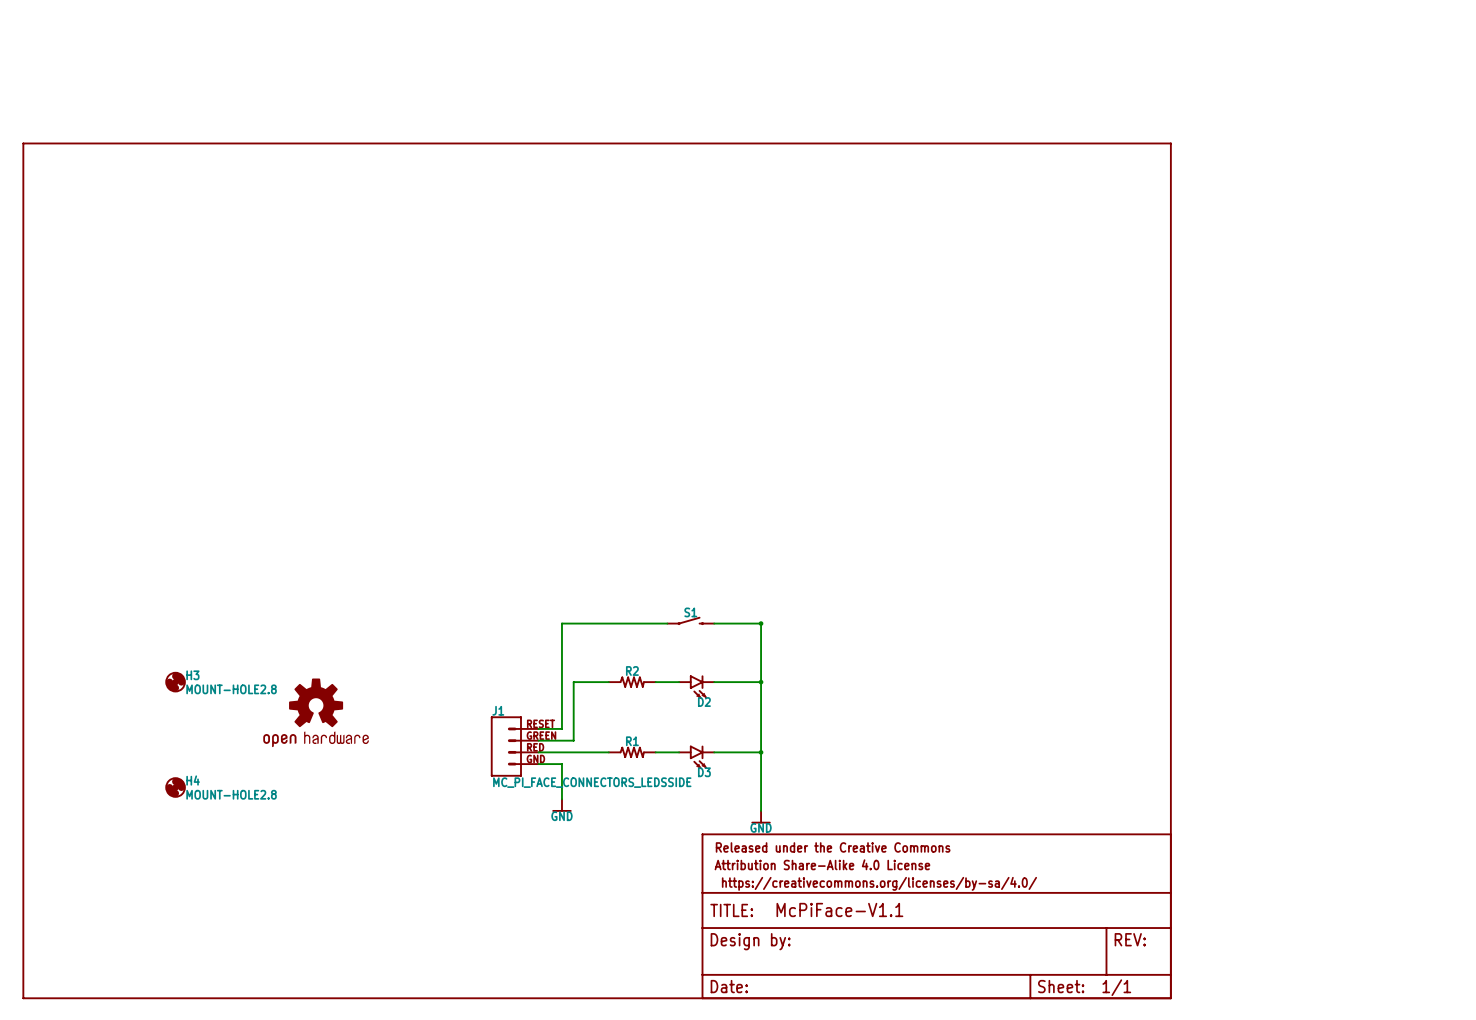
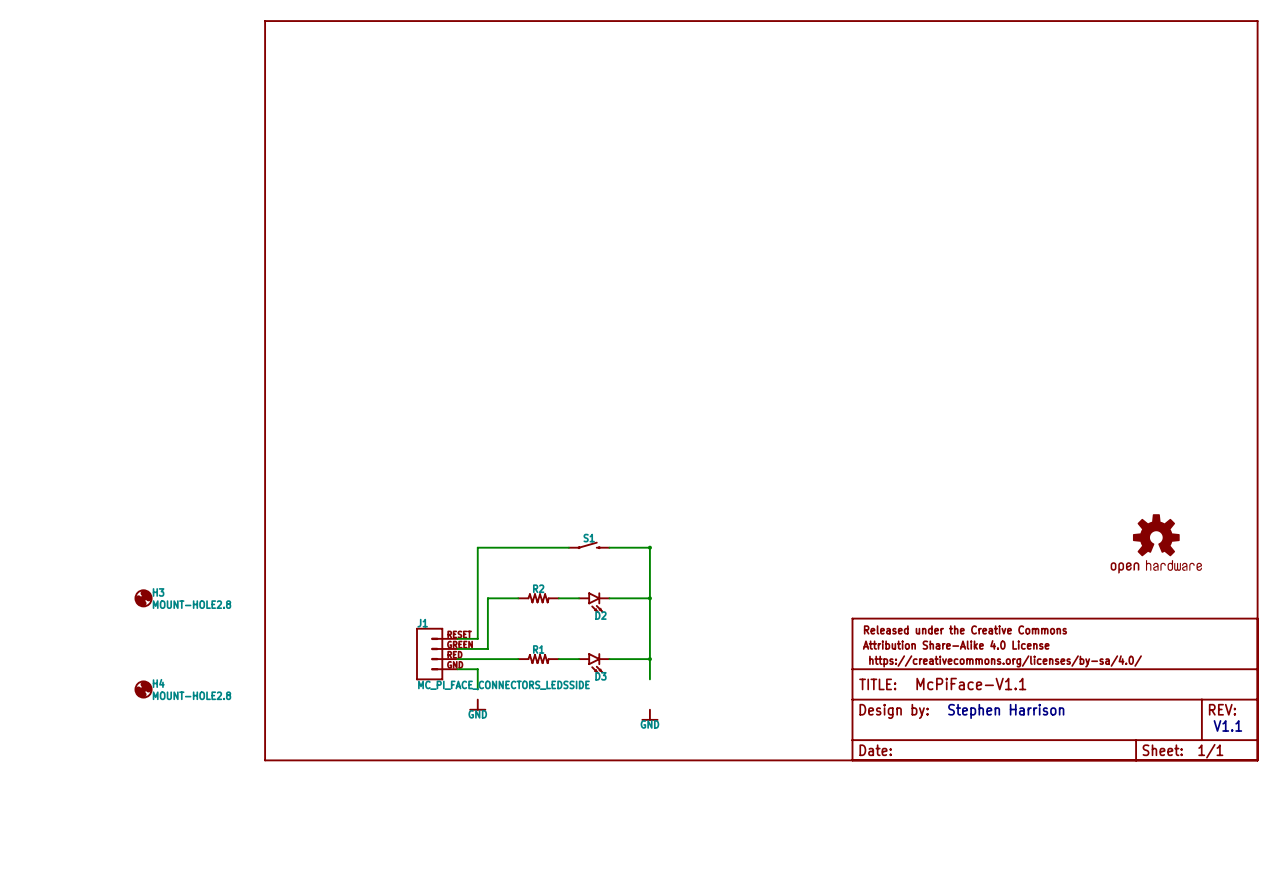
part: none -> (761, 390)
part: (597, 570) -> none
part: none -> (1156, 543)
part: (316, 712) -> none
wire: (761, 775) (761, 810) -> none
wire: (561, 787) (561, 799) -> none
part: none -> (1055, 689)
text: none -> Stephen Harrison (1006, 711)
text: none -> V1.1 (1227, 725)
part: (936, 916) -> none

